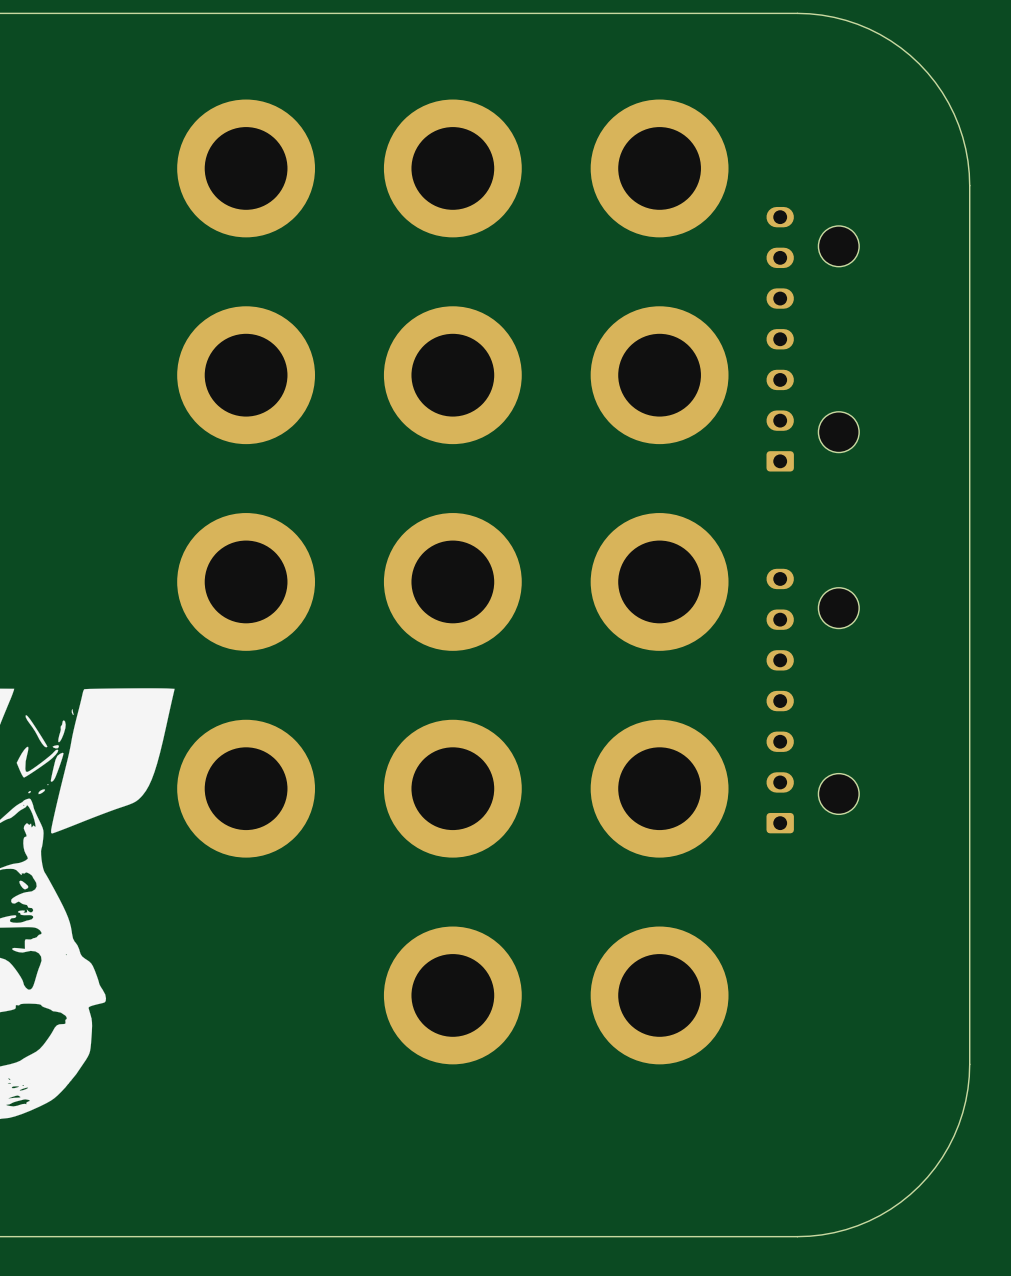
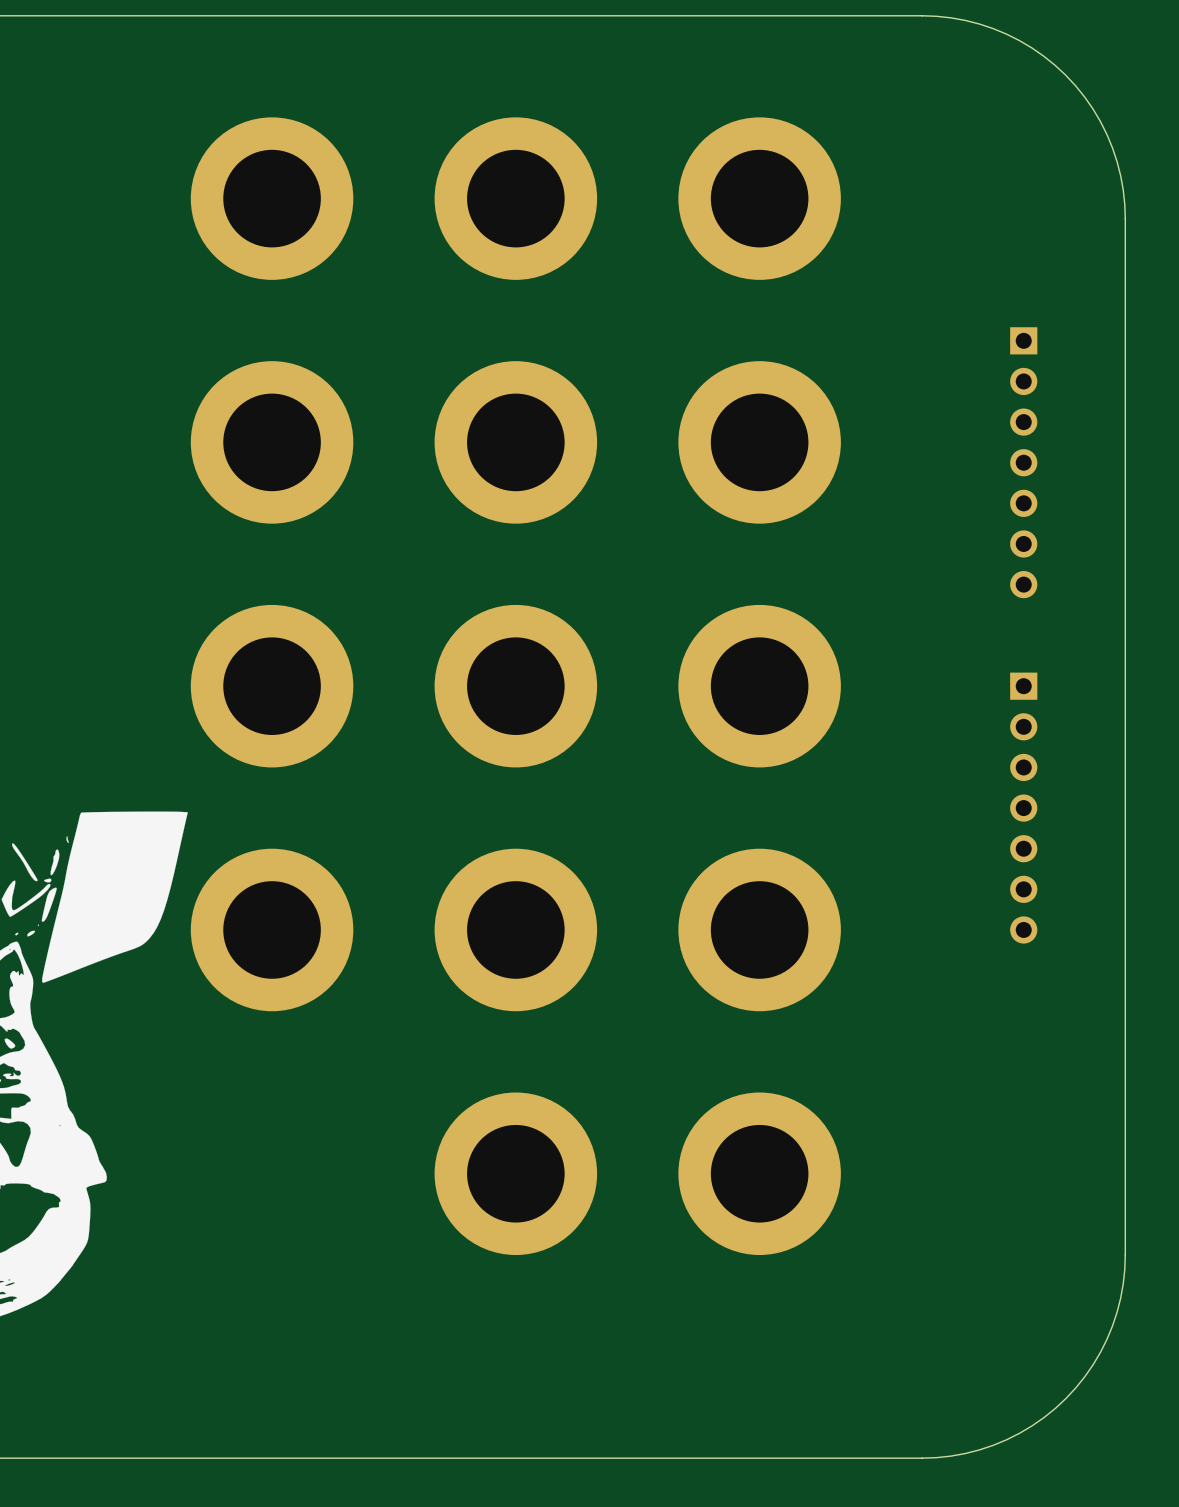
part: (812, 339) -> none
part: none -> (1023, 462)
part: none -> (1023, 808)
part: (812, 701) -> none

